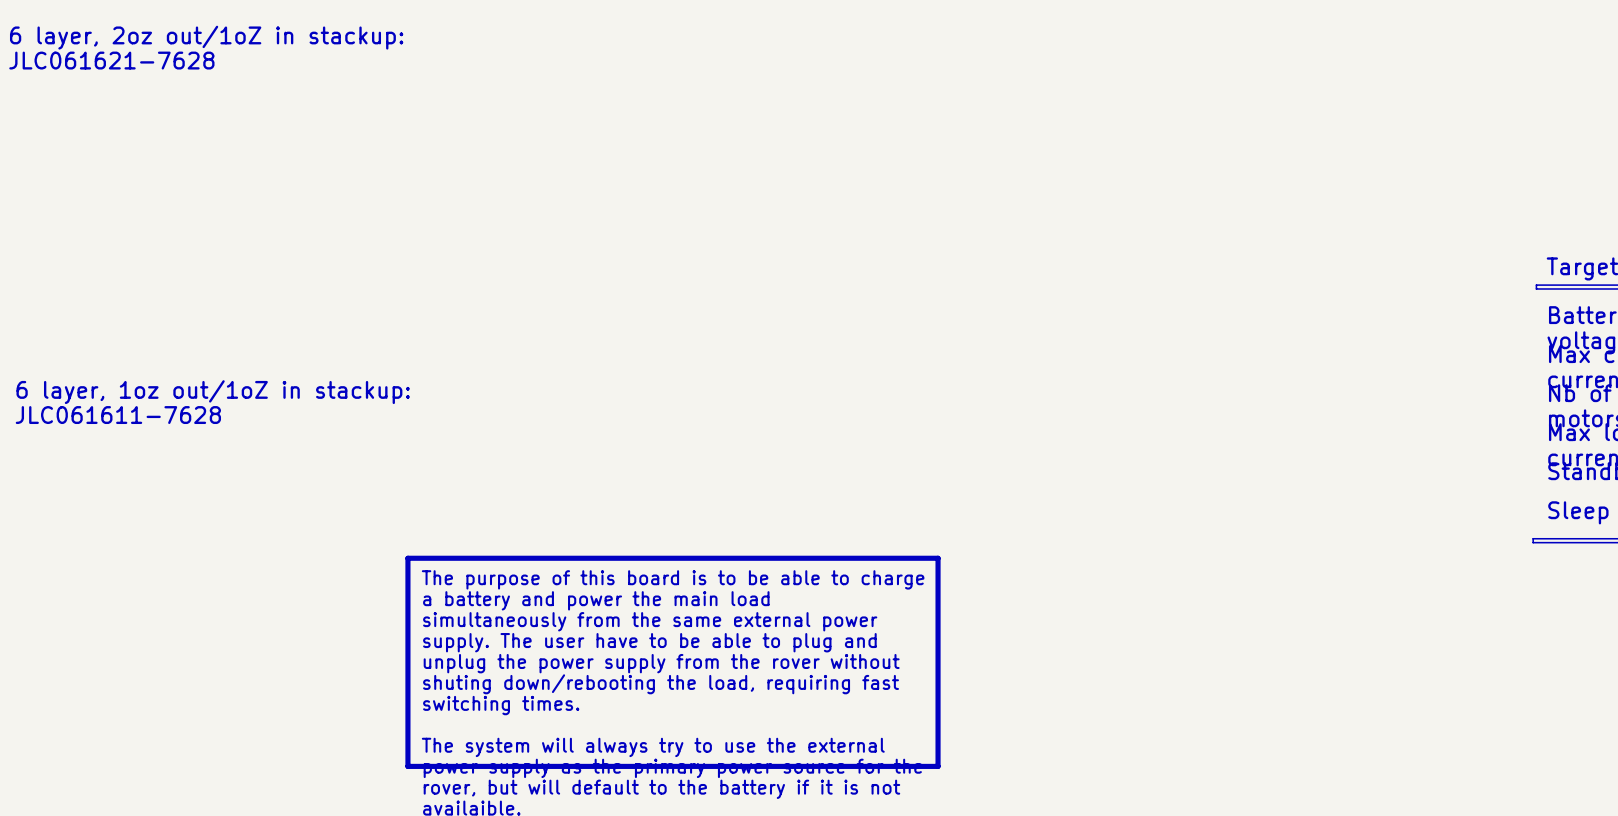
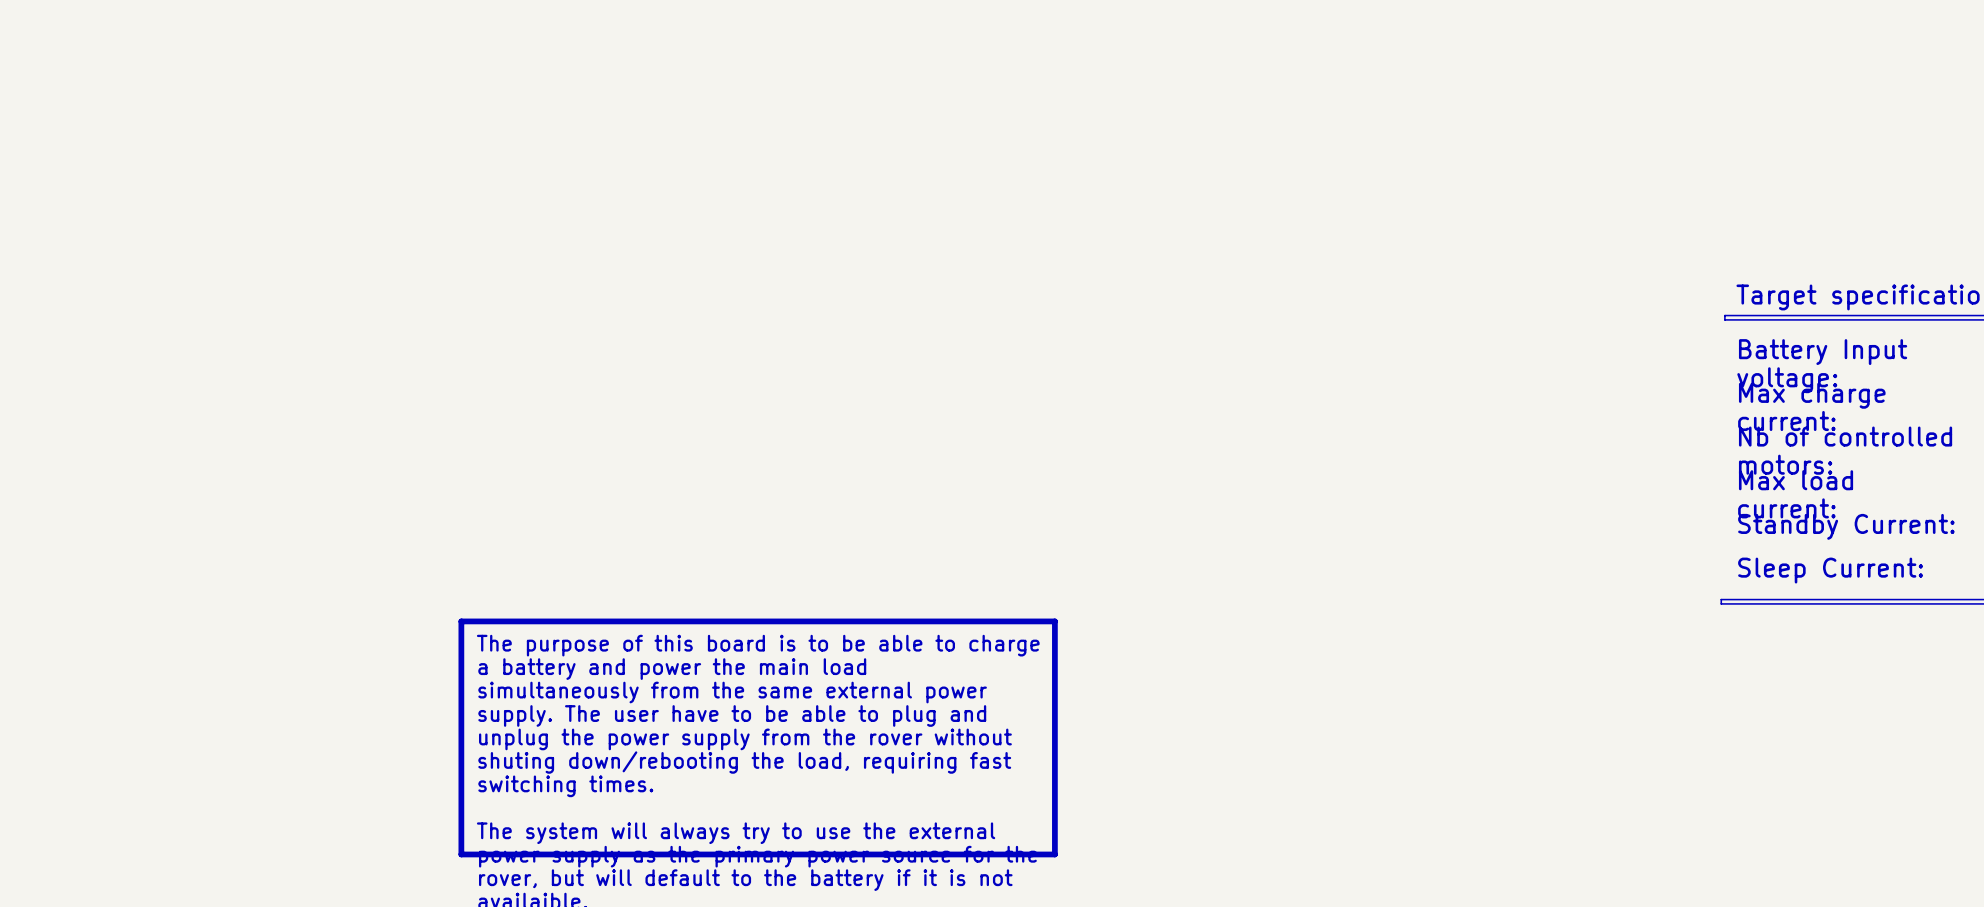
text: 6 layer, 2oz out/1oZ in stackup: (206, 37) -> none
text: JLC061621-7628 (111, 60) -> none
text: 6 layer, 1oz out/1oZ in stackup: (213, 392) -> none
text: JLC061611-7628 (118, 415) -> none

